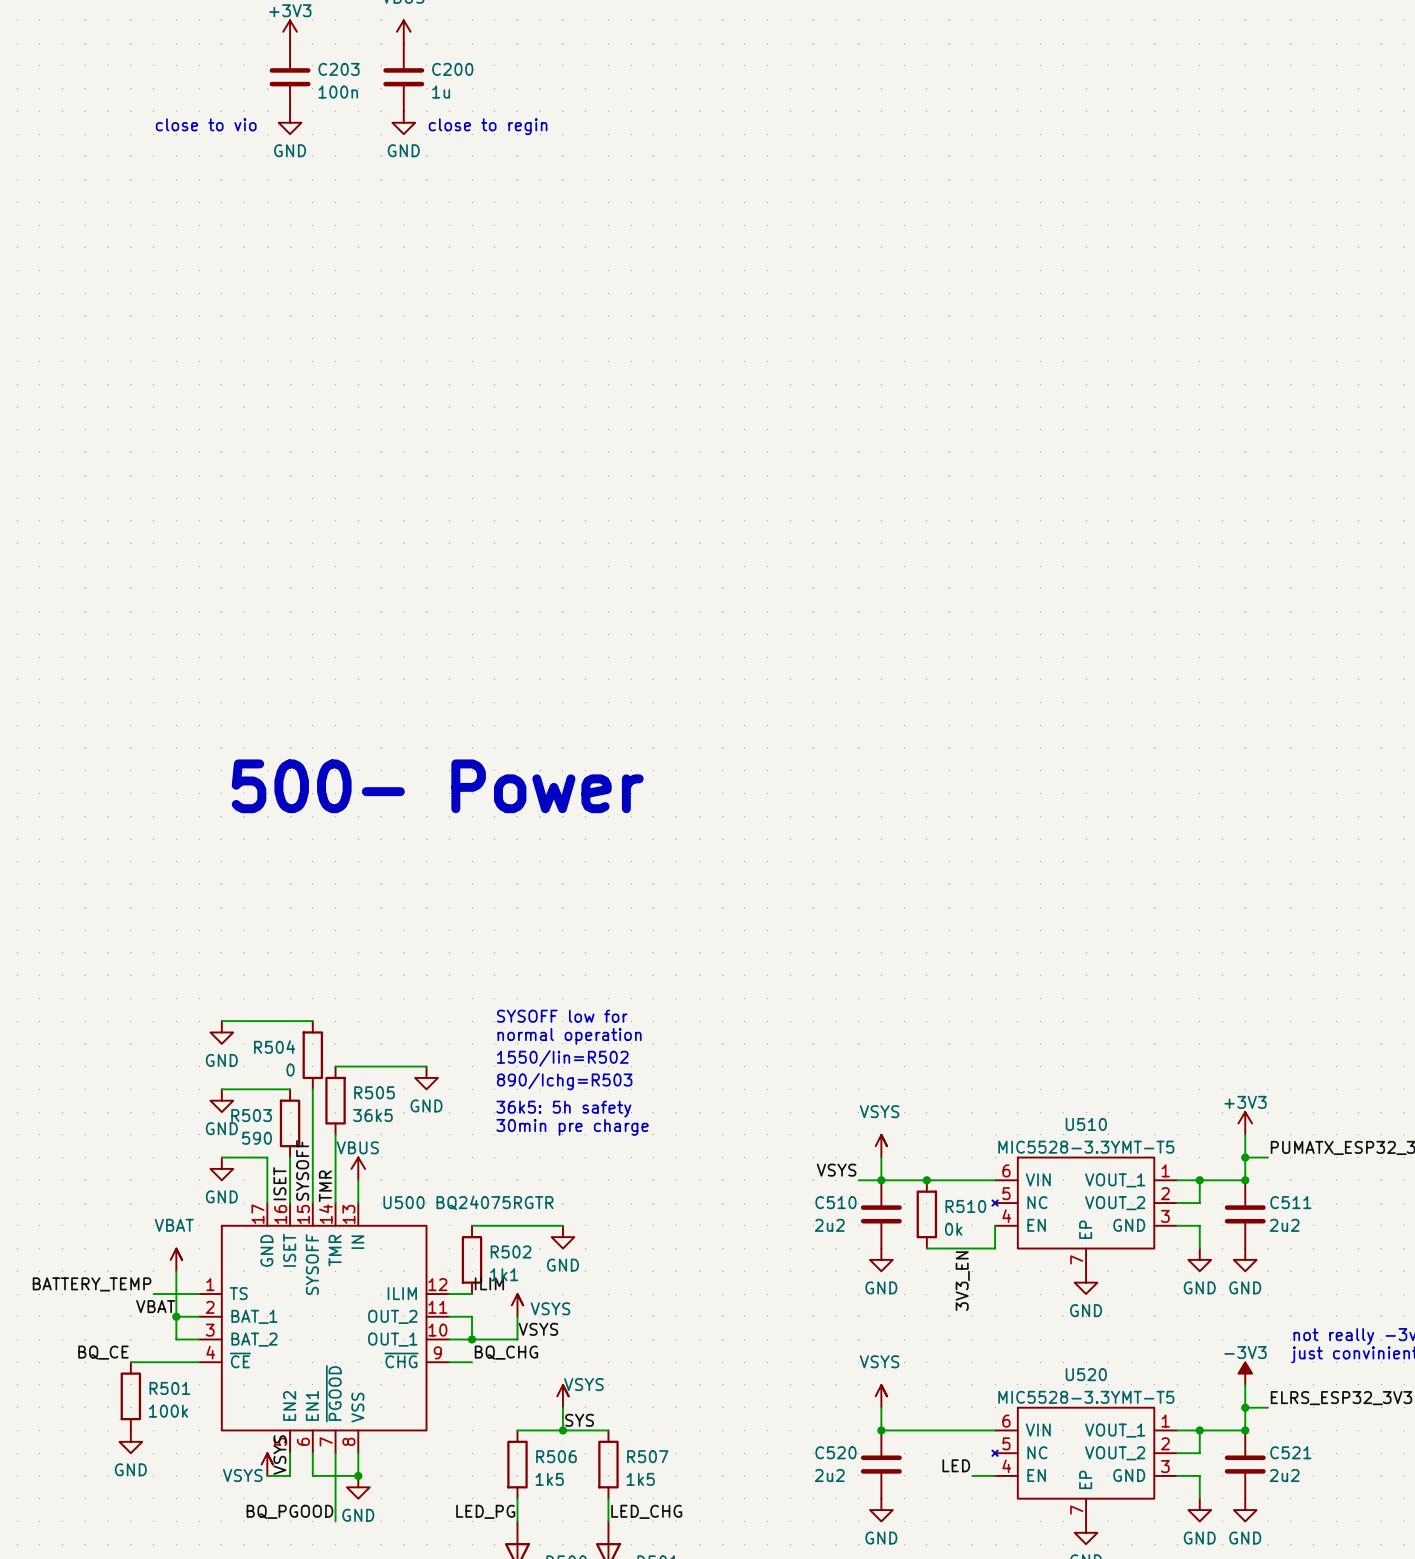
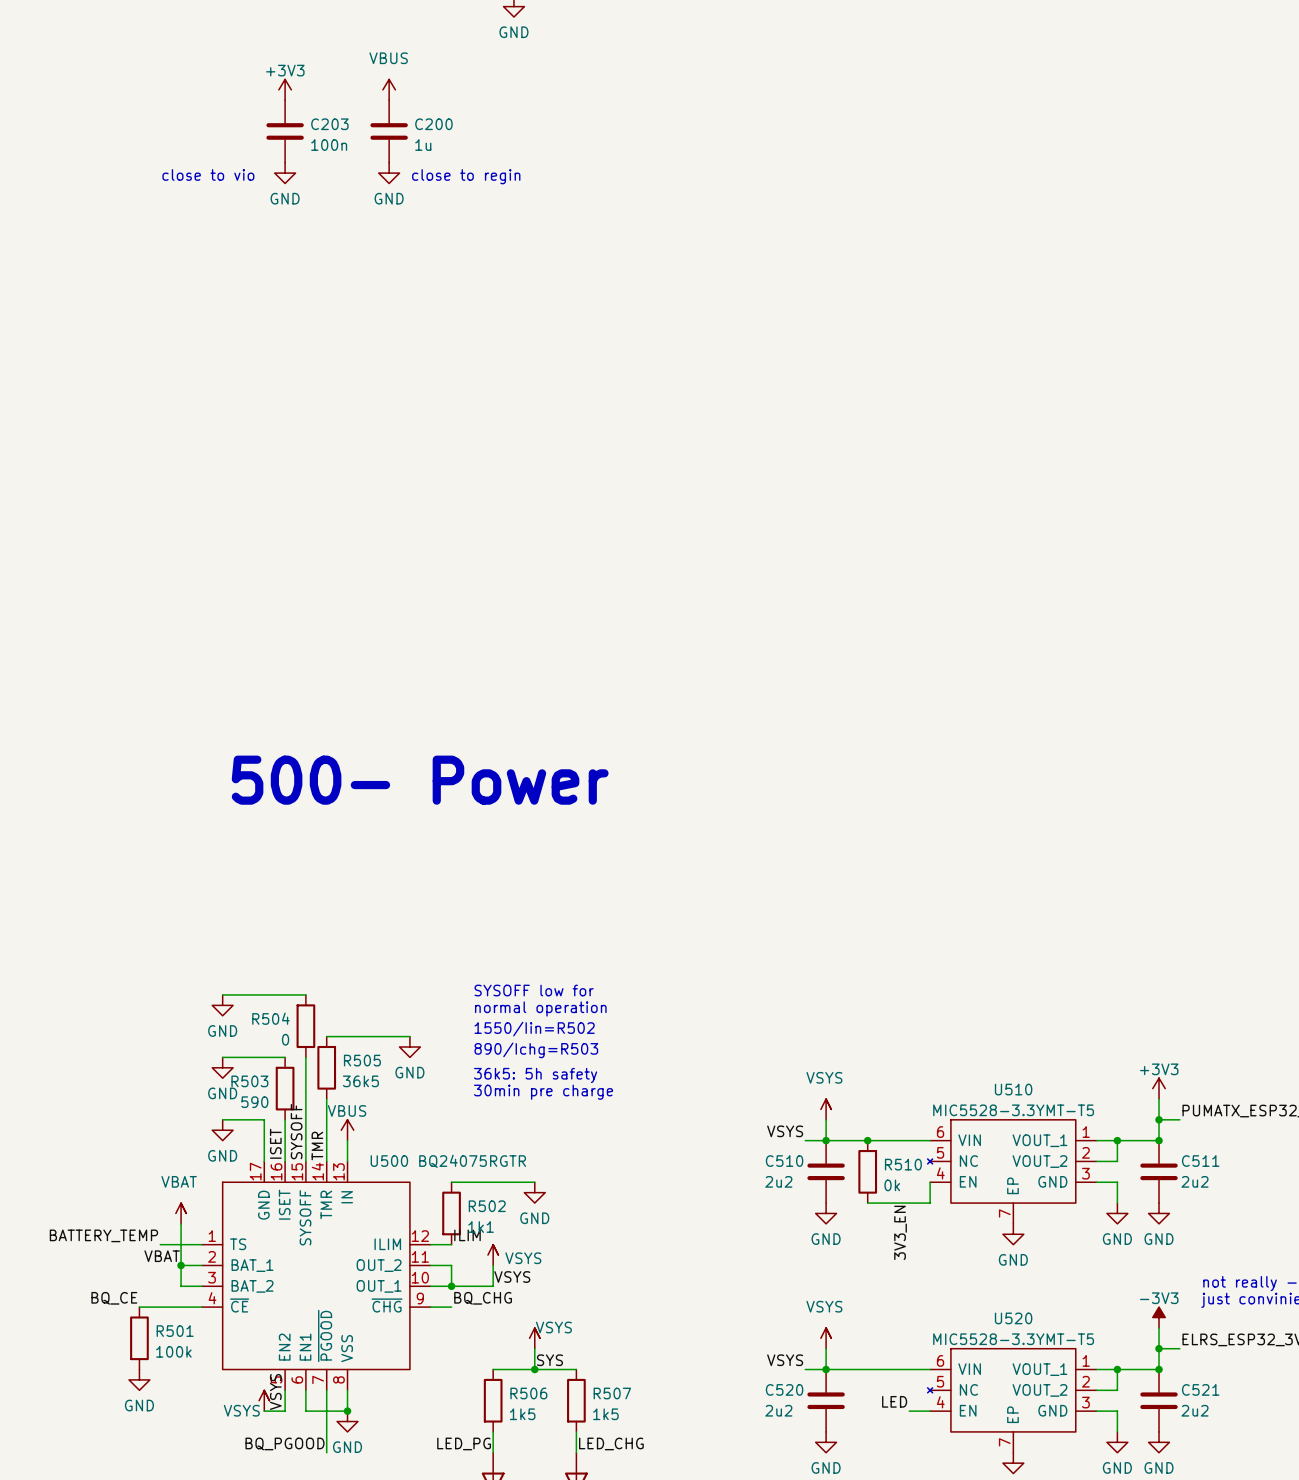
label: none -> VSYS (785, 1360)
wire: none -> (805, 1369) (826, 1369)

